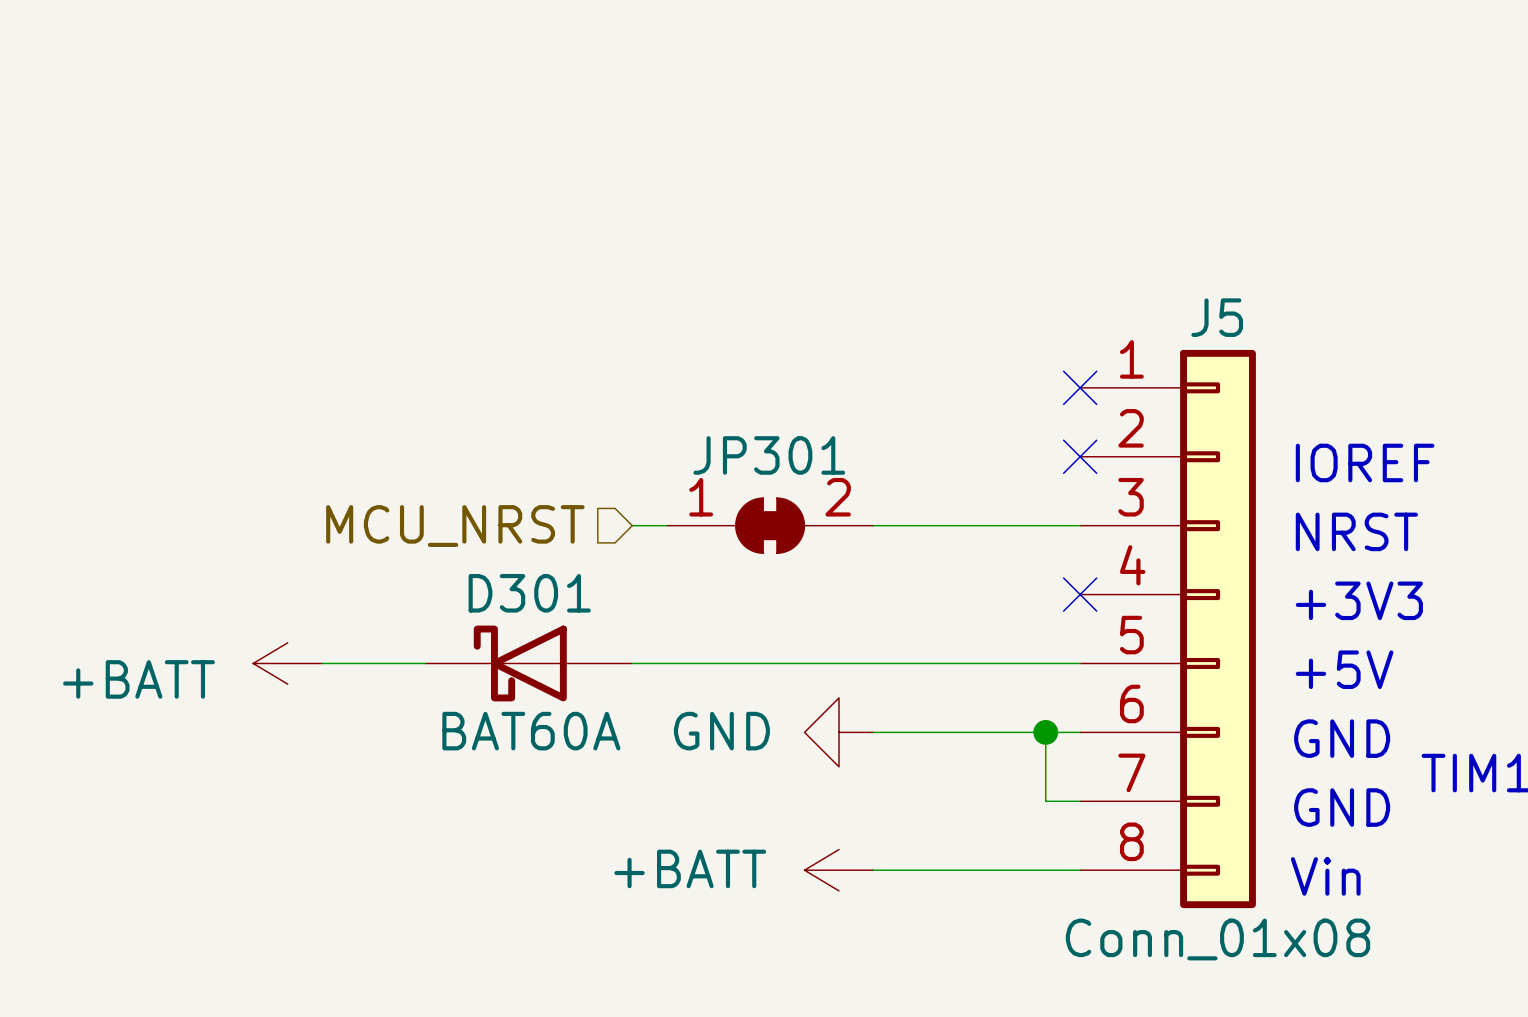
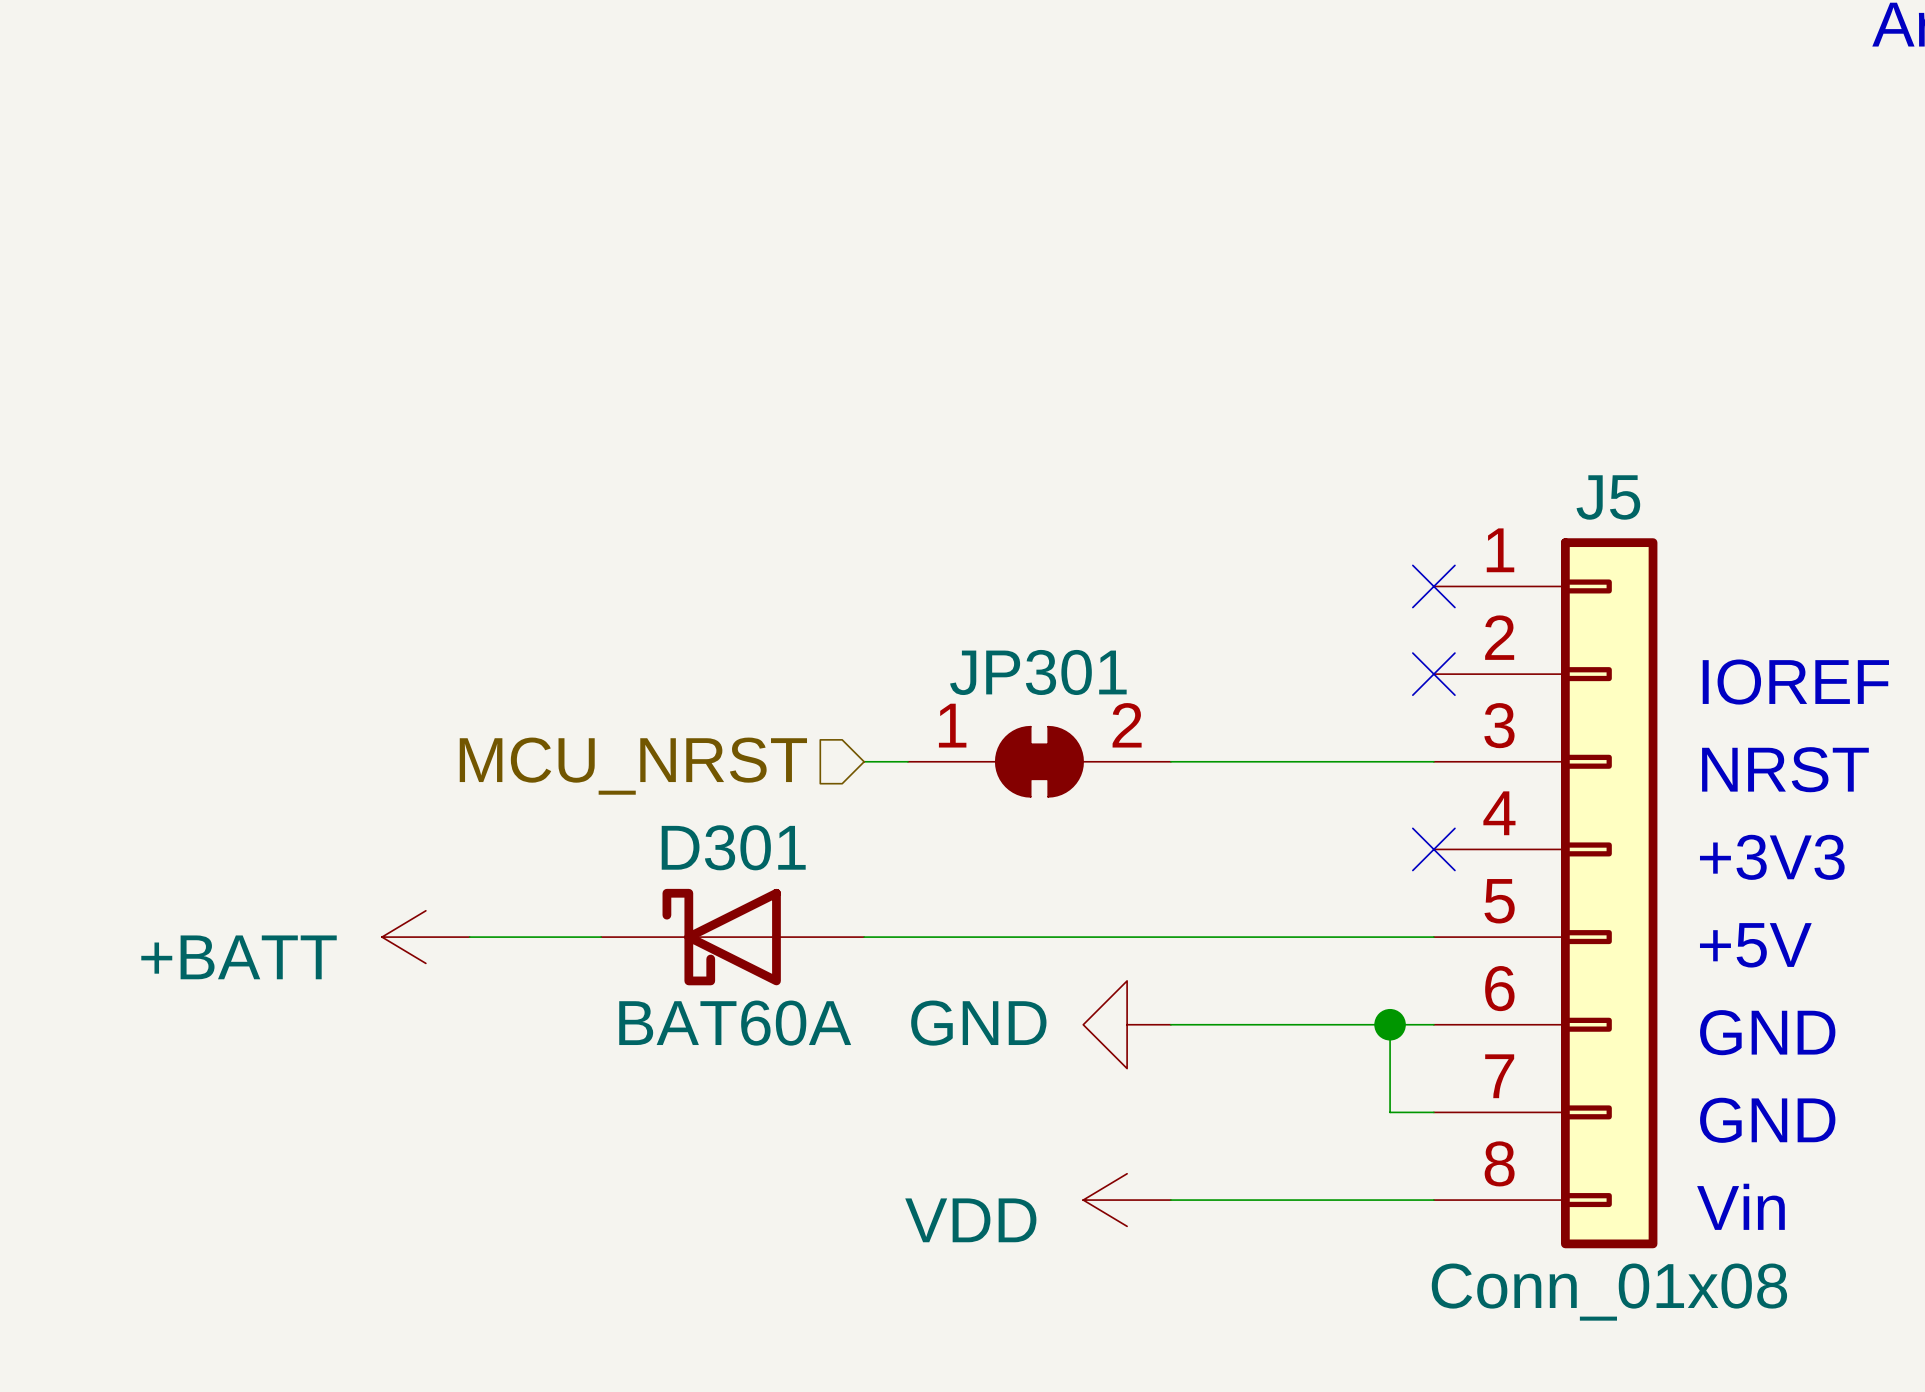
power symbol: +BATT (839, 870) -> VDD (1127, 1200)

